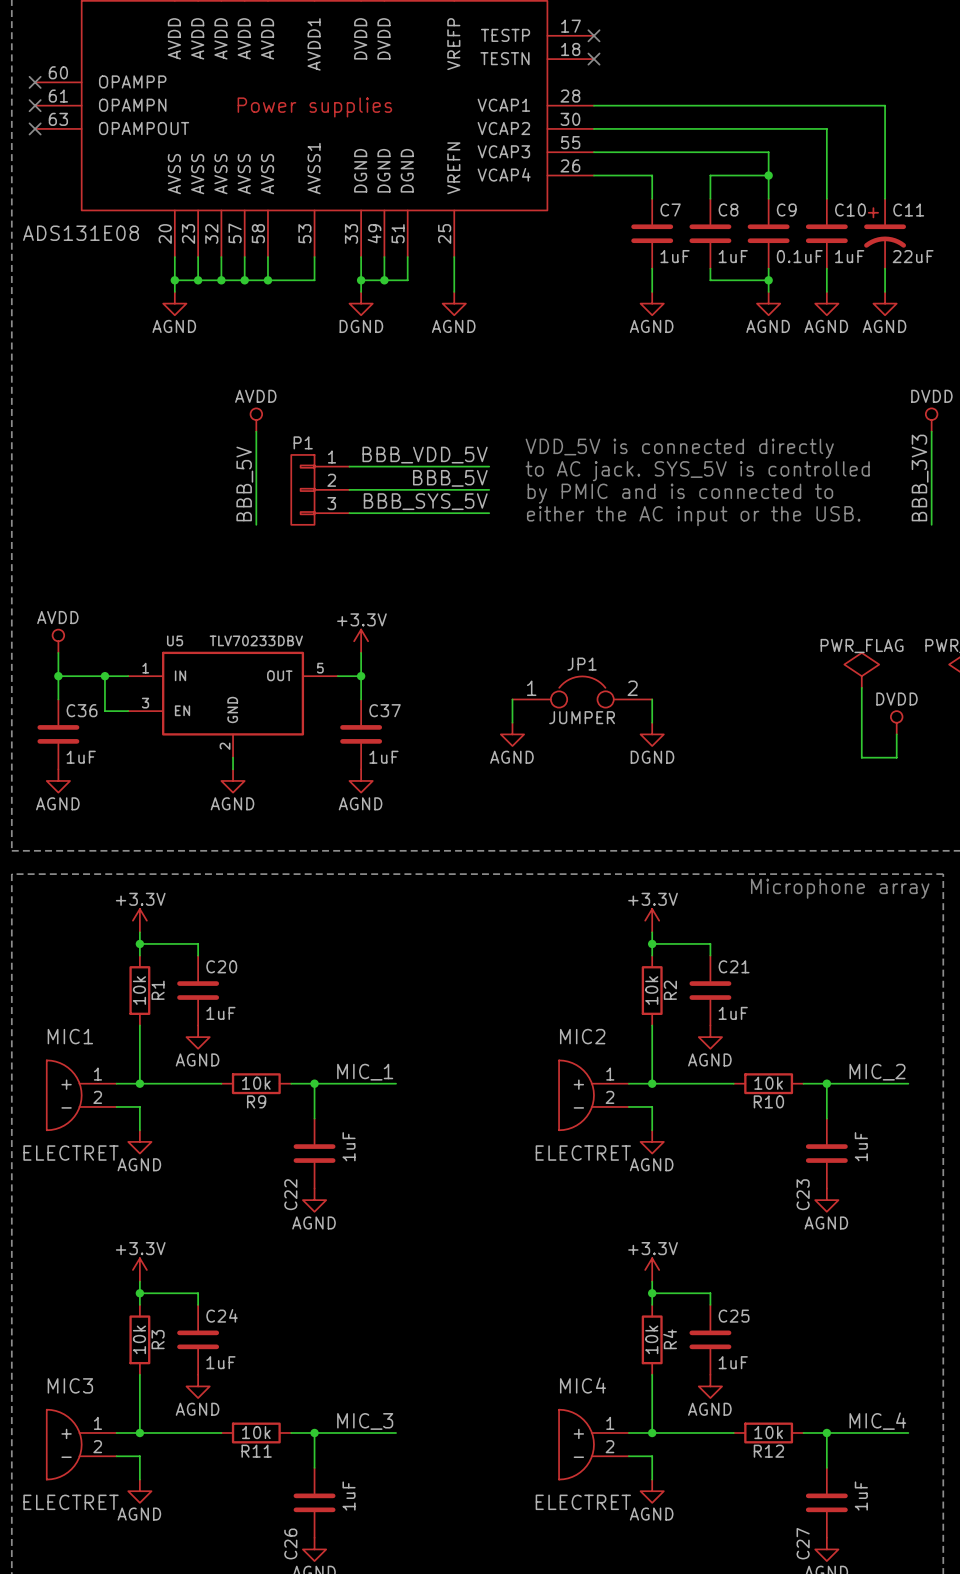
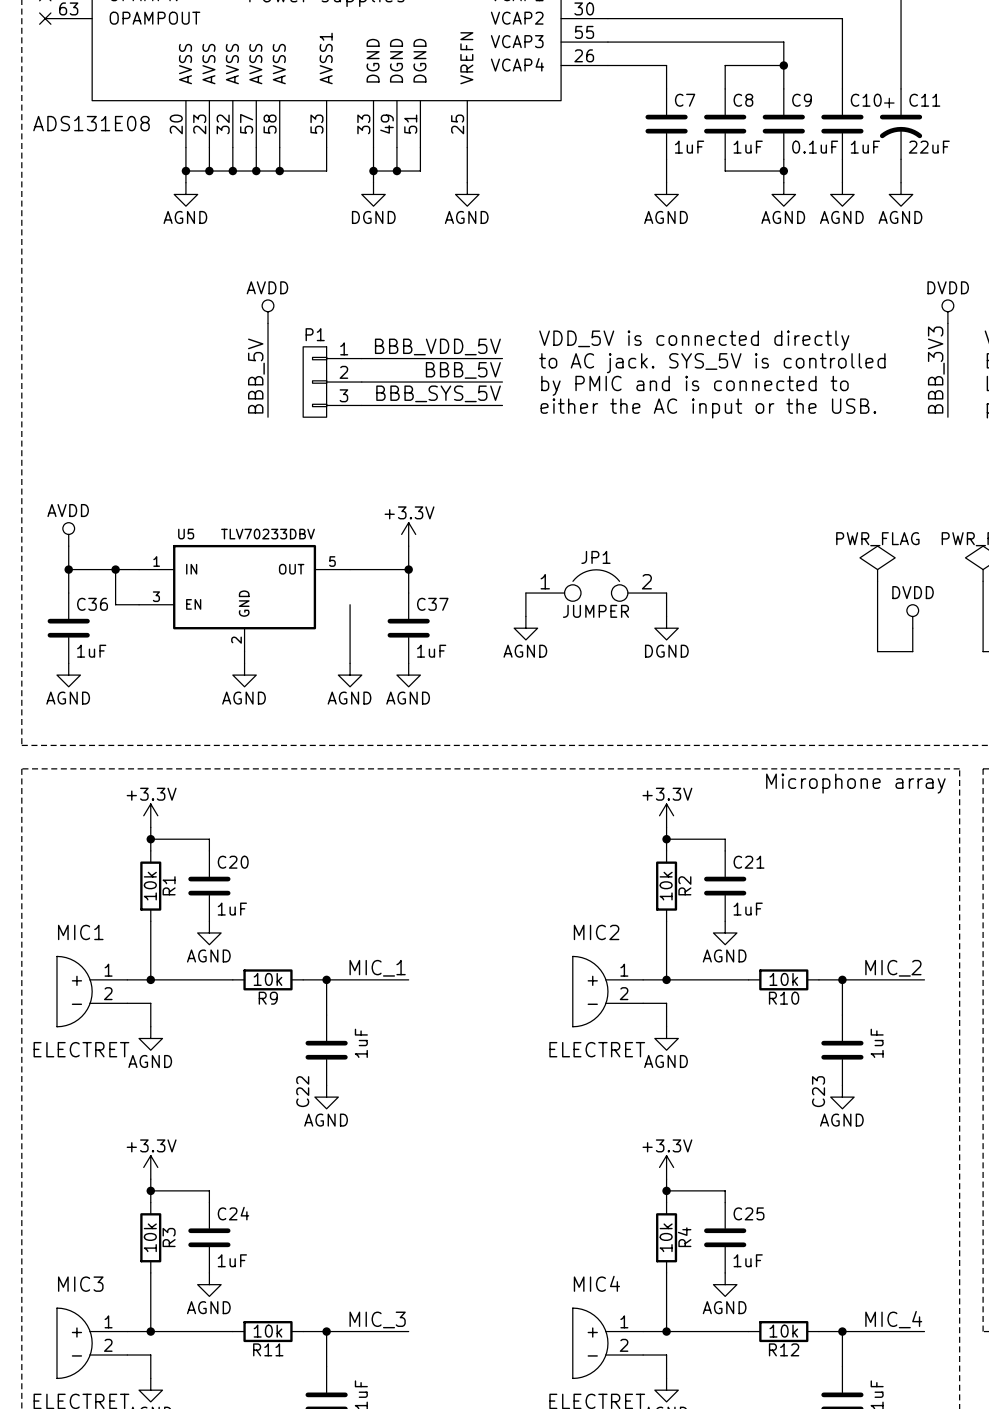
power symbol position: +3.3V (361, 641) -> +3.3V (408, 534)
wire: (361, 652) (361, 699) -> (408, 546) (408, 593)
wire: none -> (373, 569) (408, 569)
junction position: (361, 676) -> (408, 569)
wire: none -> (350, 604) (350, 663)
C37 position: (361, 734) -> (408, 628)
power symbol: none -> AGND (350, 675)
power symbol: AGND (361, 780) -> none
power symbol: none -> AGND (408, 675)

